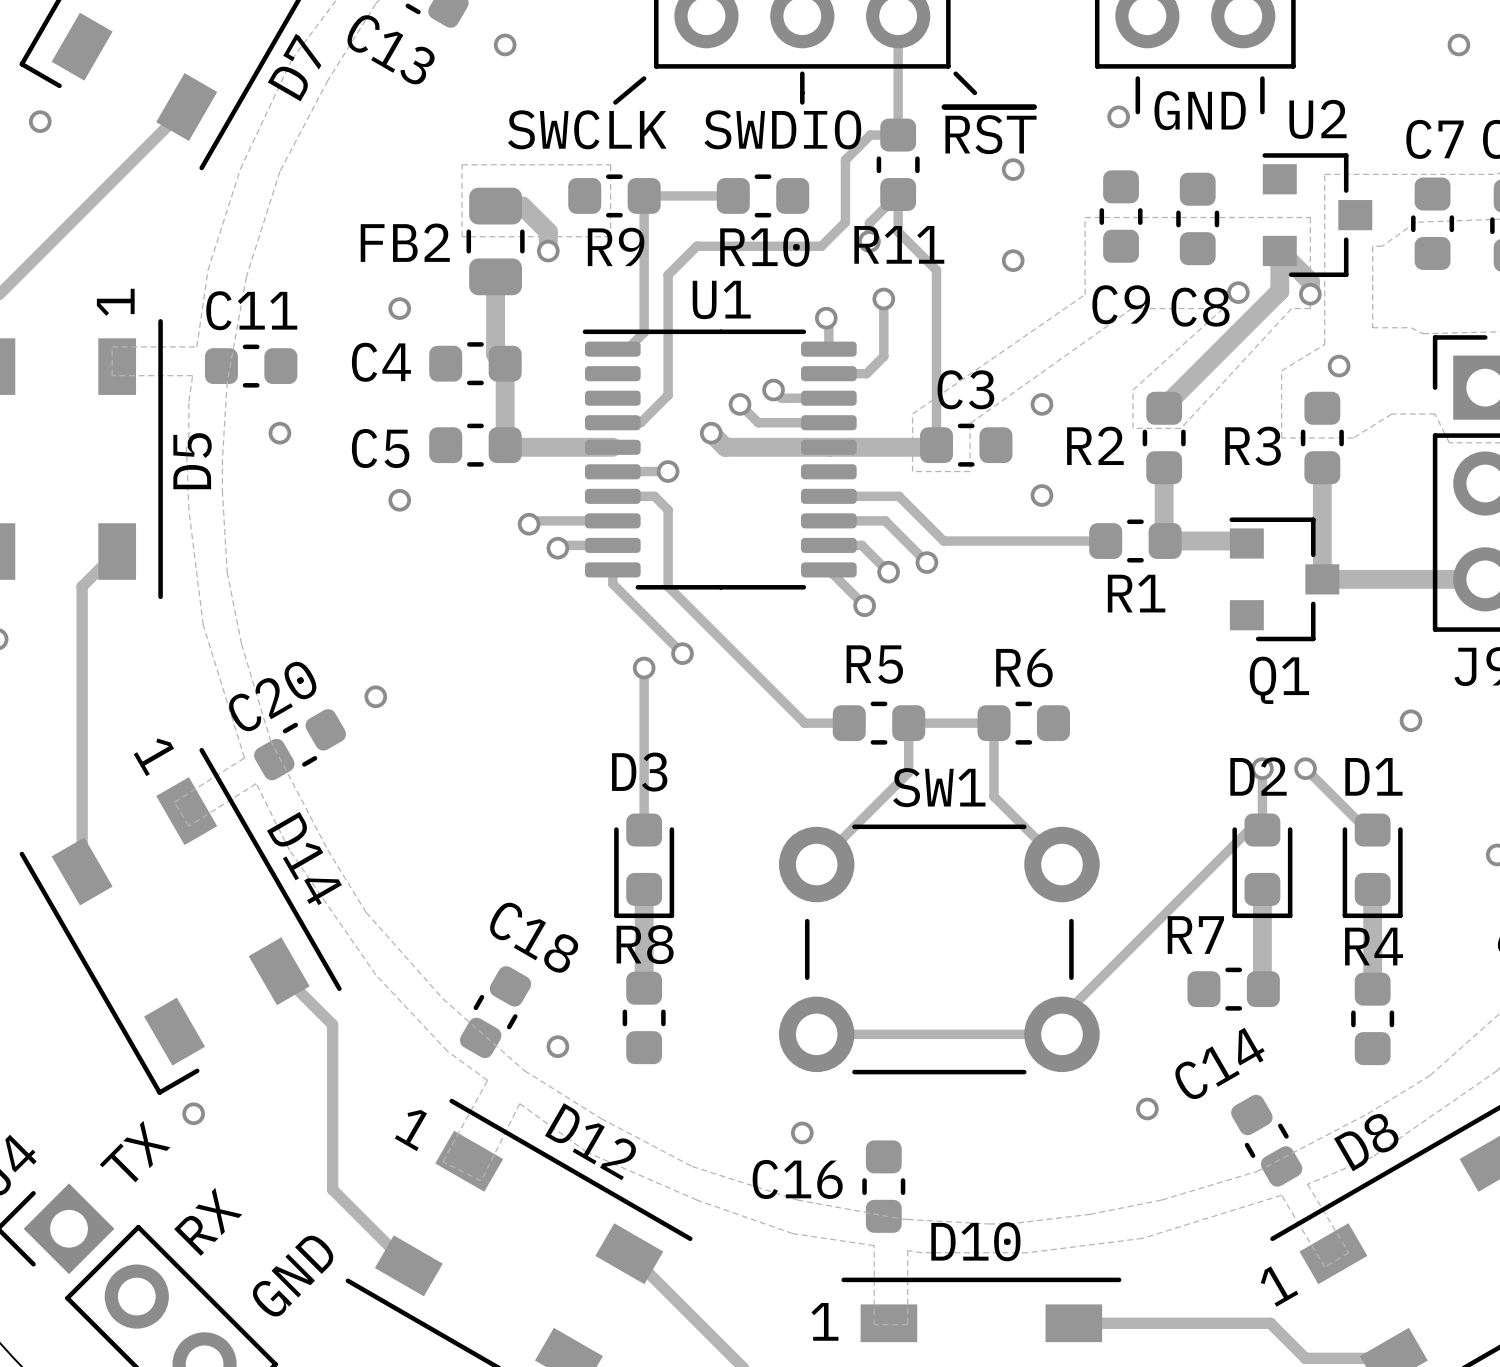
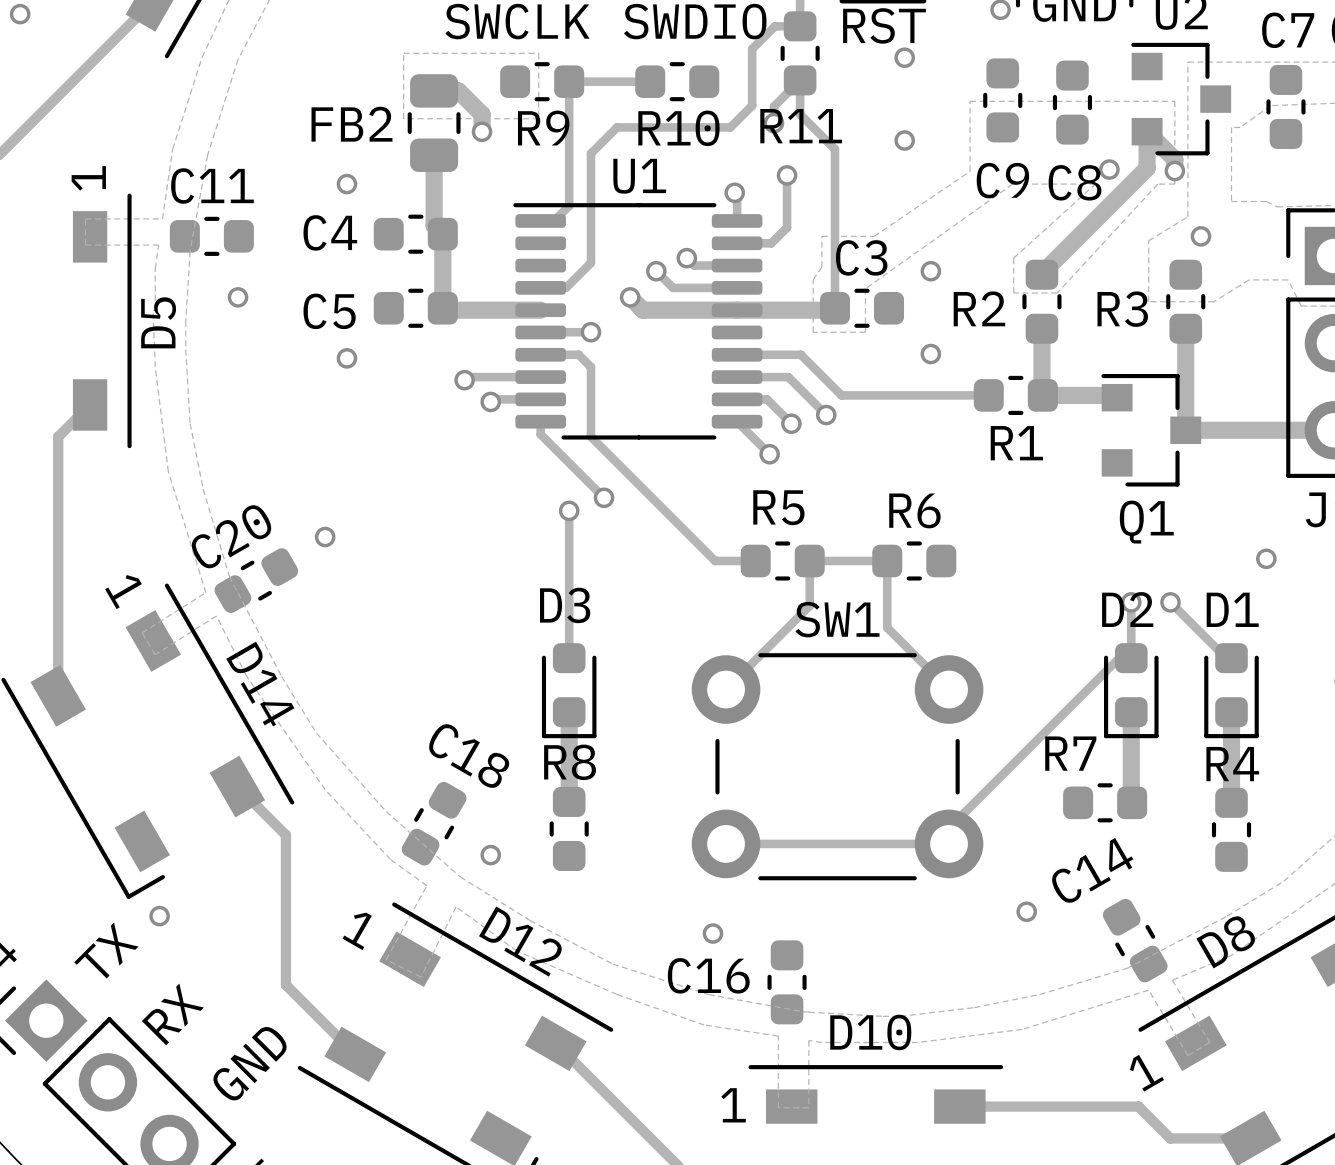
zone outline: (1085, 294) (912, 414) -> (970, 171) (874, 236) (821, 236) (821, 266) (813, 279)

